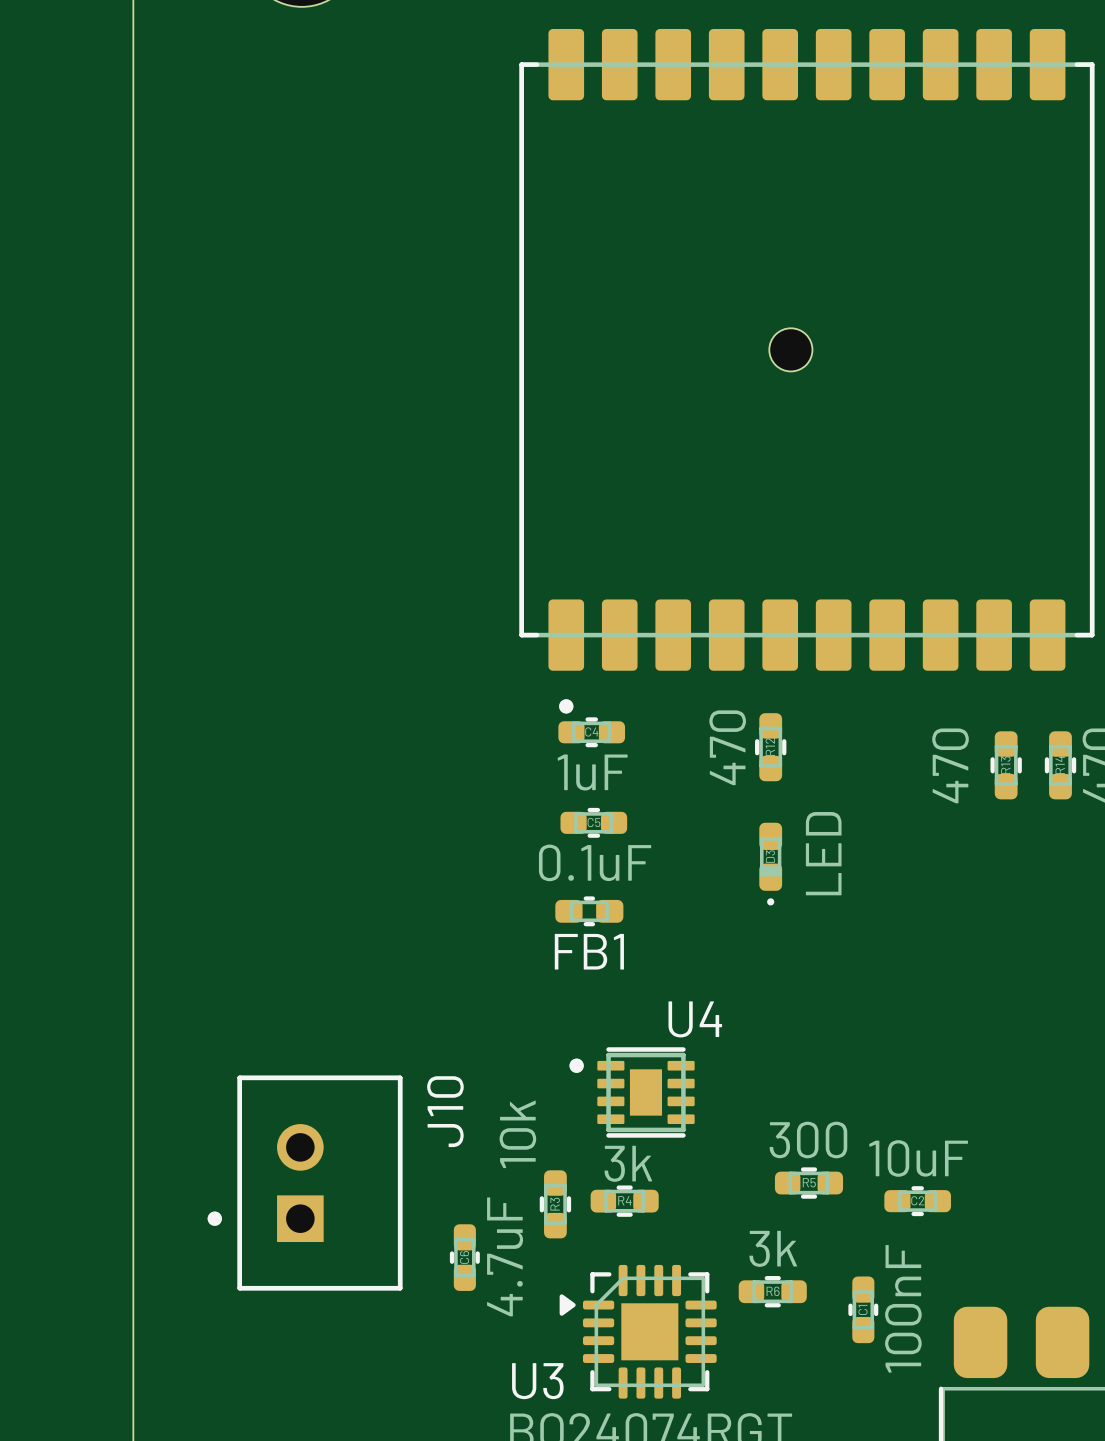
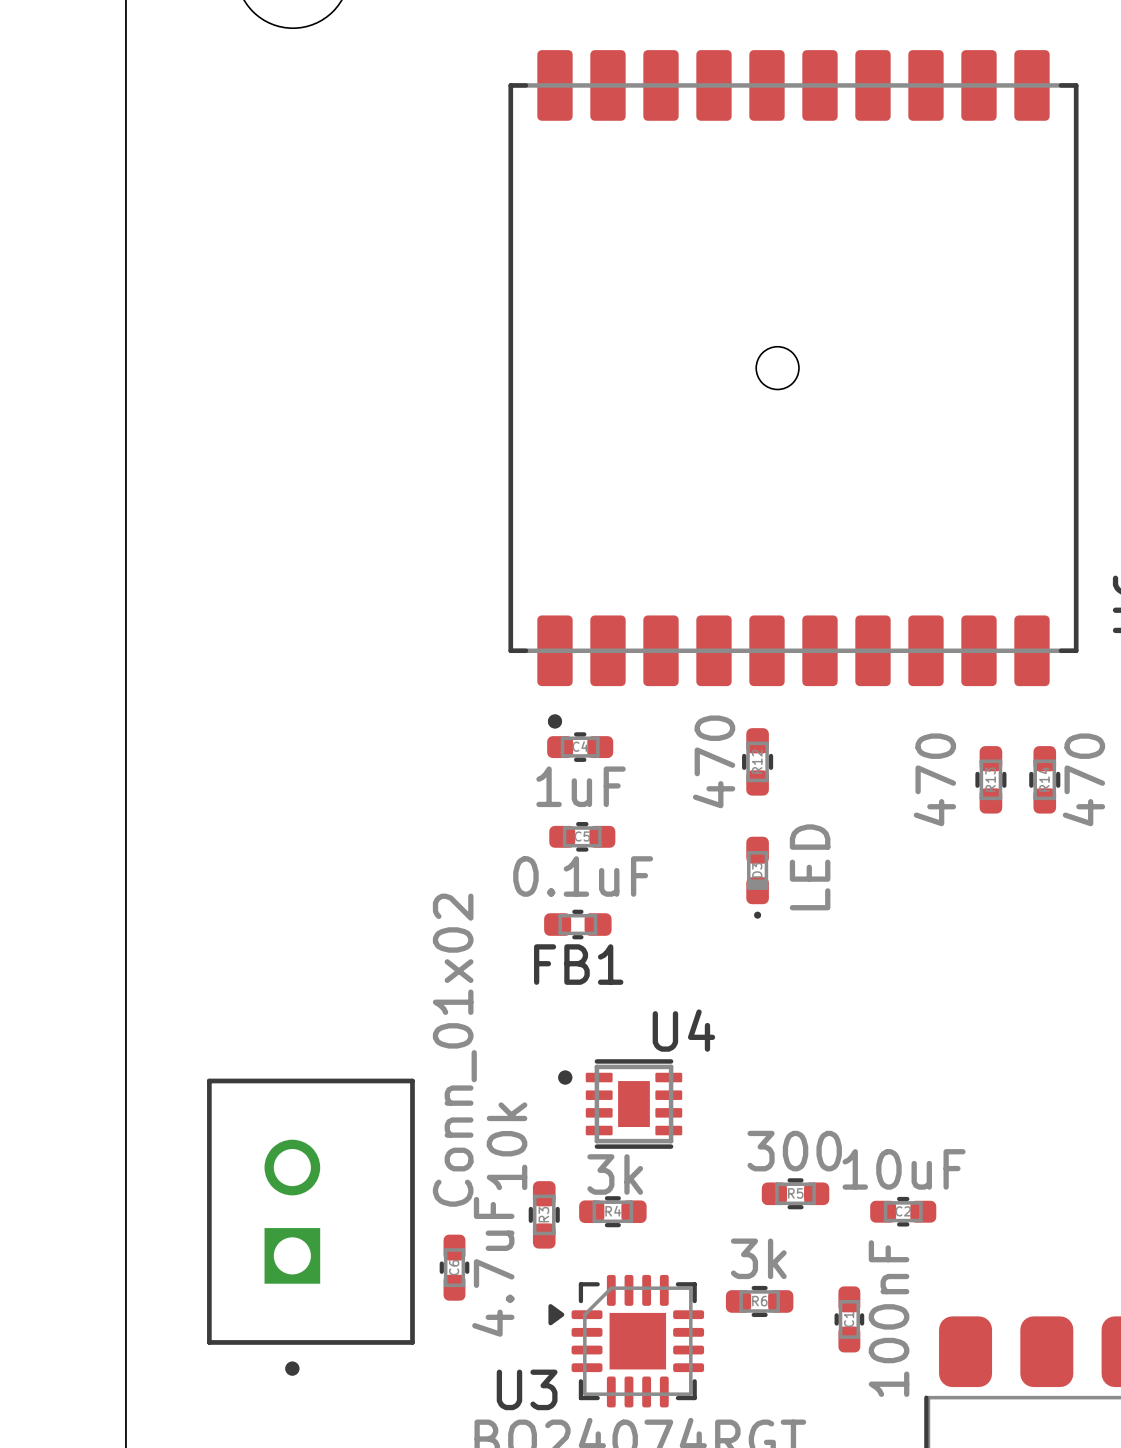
J10: (305, 1183) -> none
part: none -> Conn_01x02 (310, 1227)

